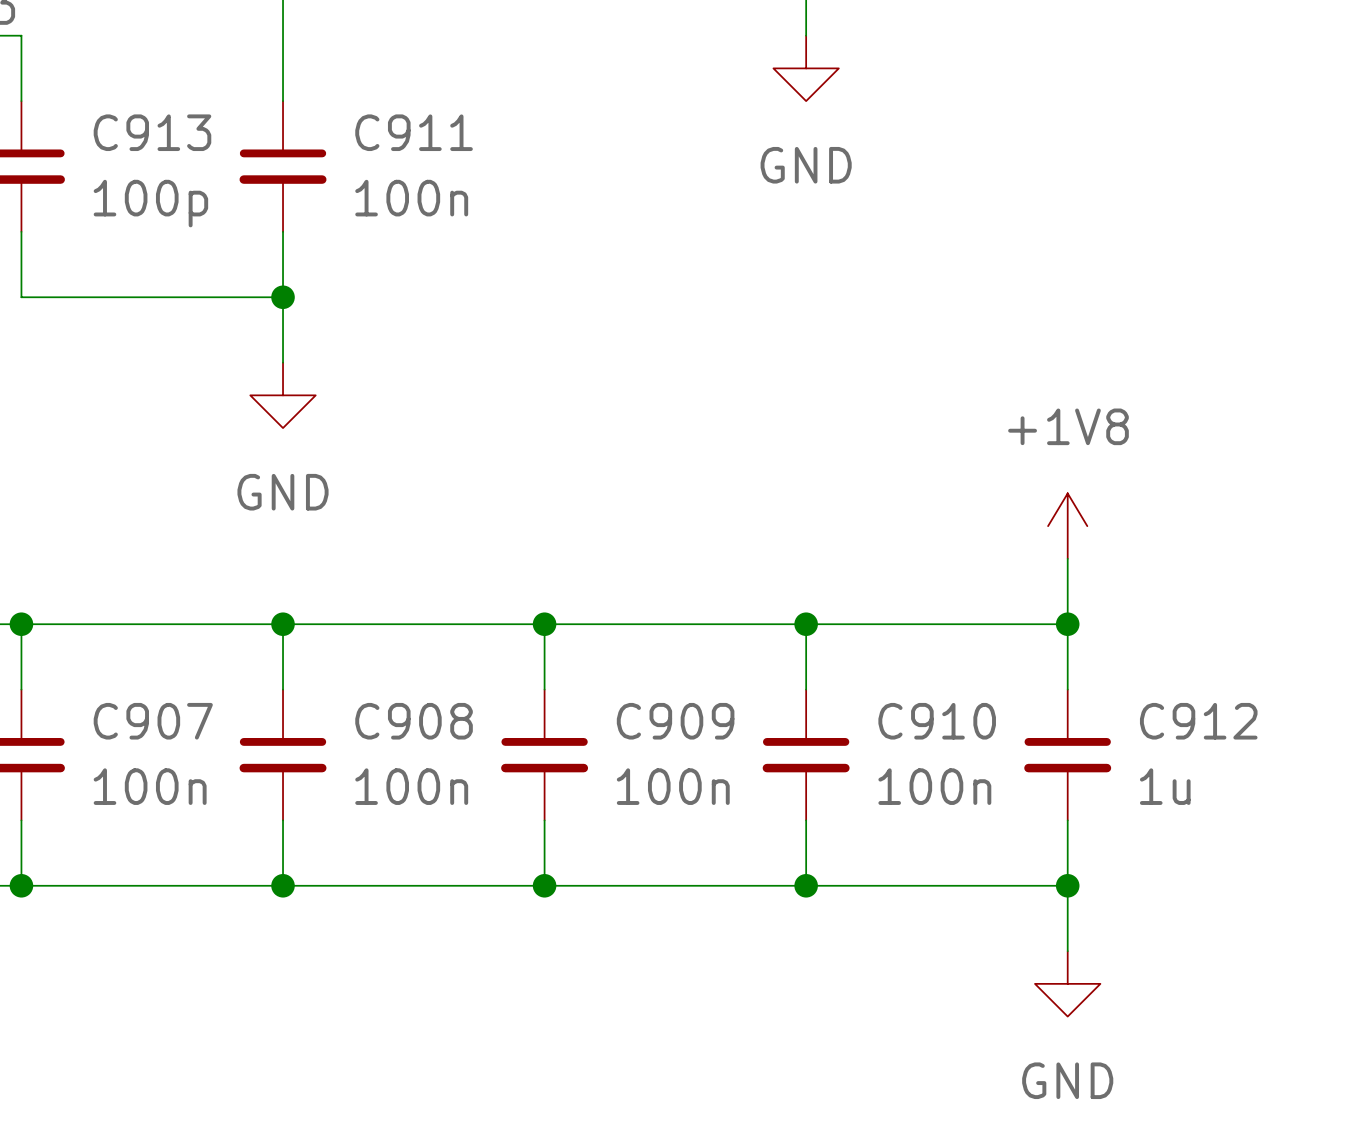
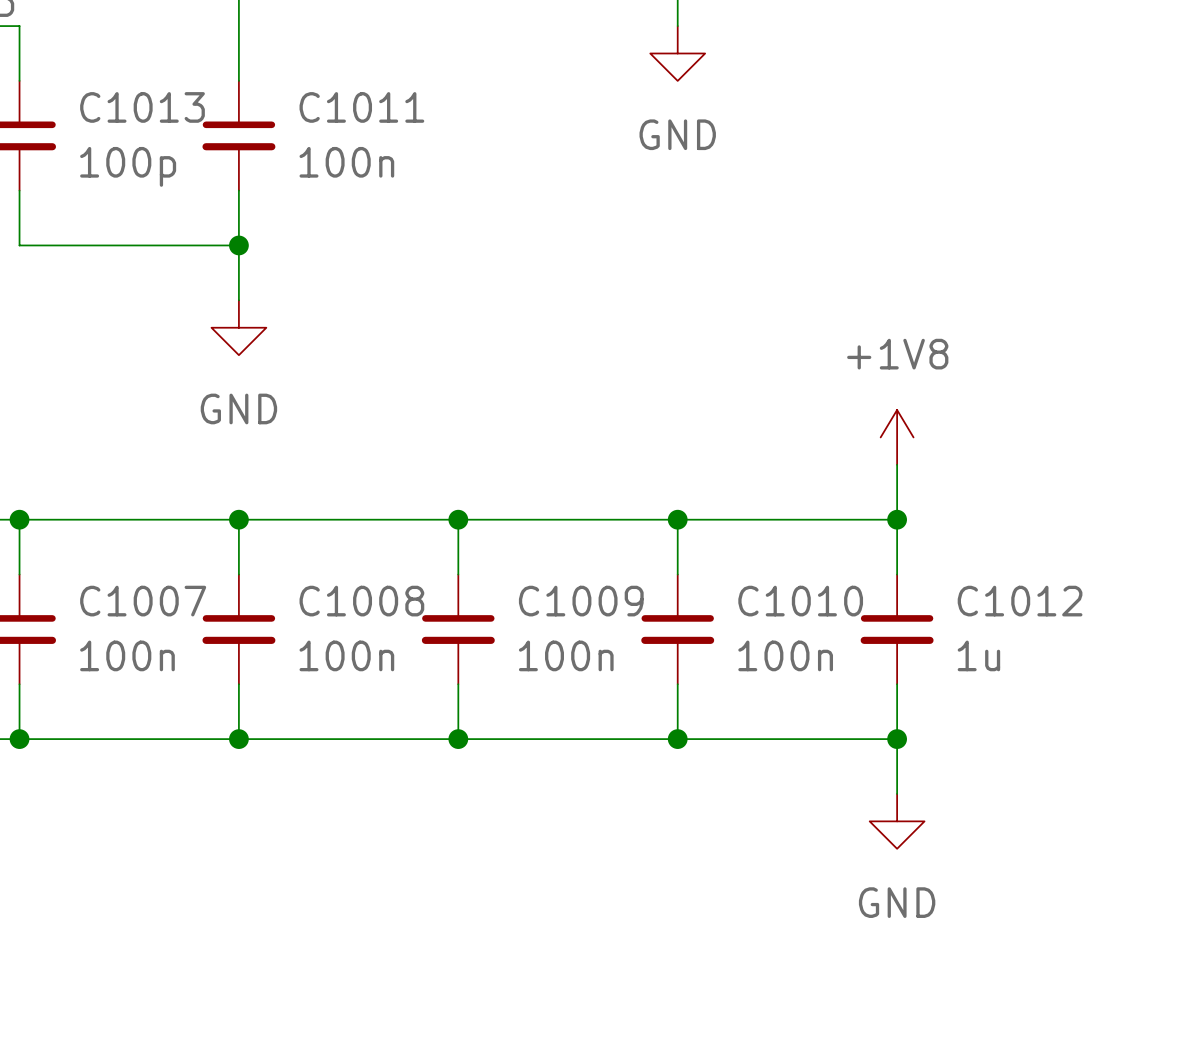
C913 name: C913 (152, 132) -> C1013 (142, 107)
C911 name: C911 (414, 132) -> C1011 (361, 107)
C907 name: C907 (153, 721) -> C1007 (143, 601)
C908 name: C908 (414, 721) -> C1008 (361, 601)
C909 name: C909 (675, 721) -> C1009 (581, 601)
C910 name: C910 (937, 721) -> C1010 (800, 601)
C912 name: C912 (1198, 721) -> C1012 (1020, 601)

